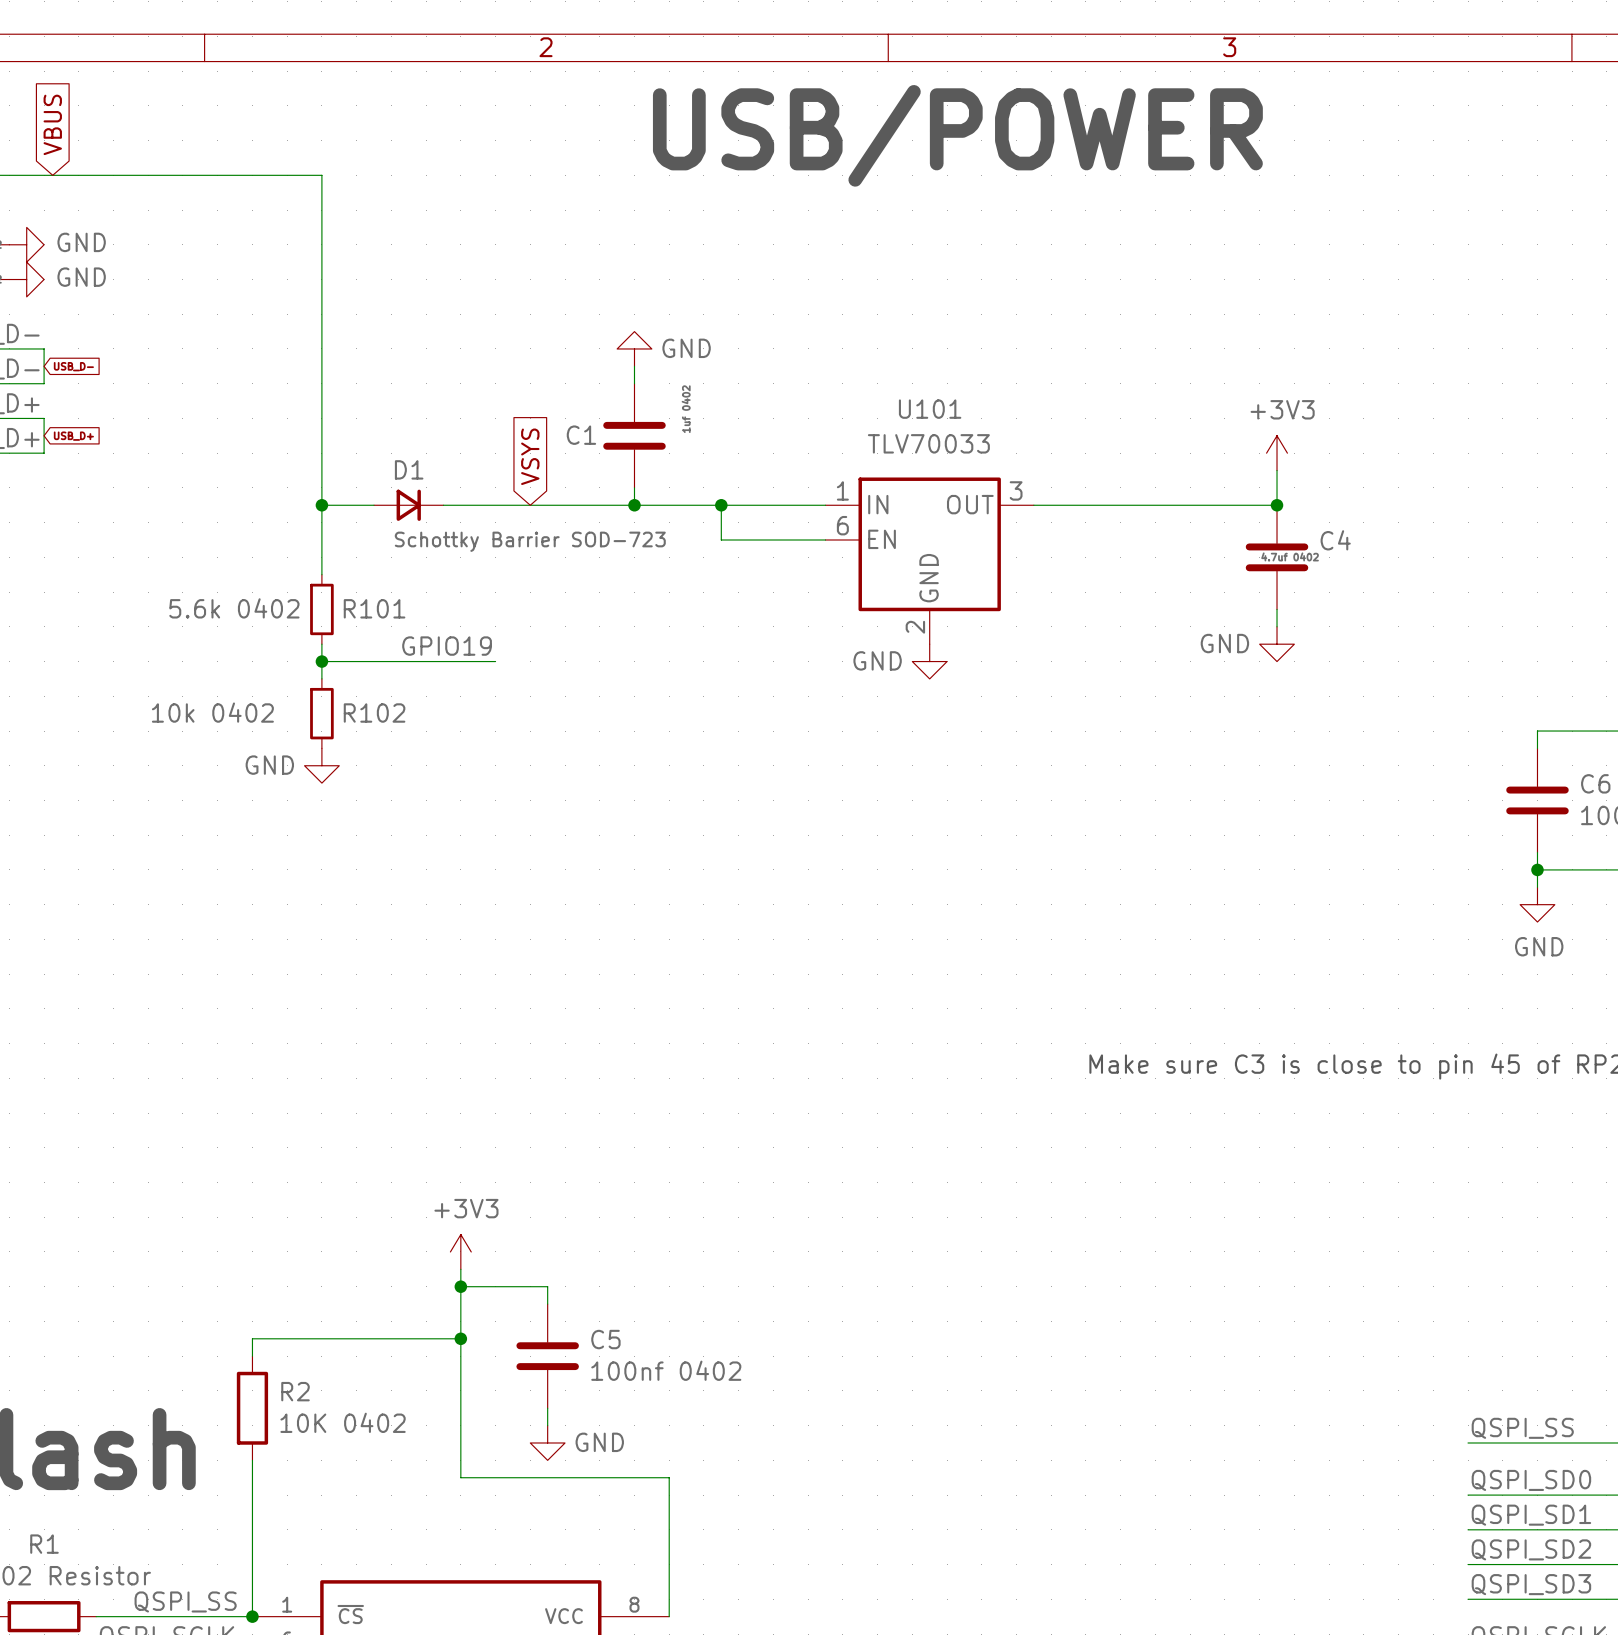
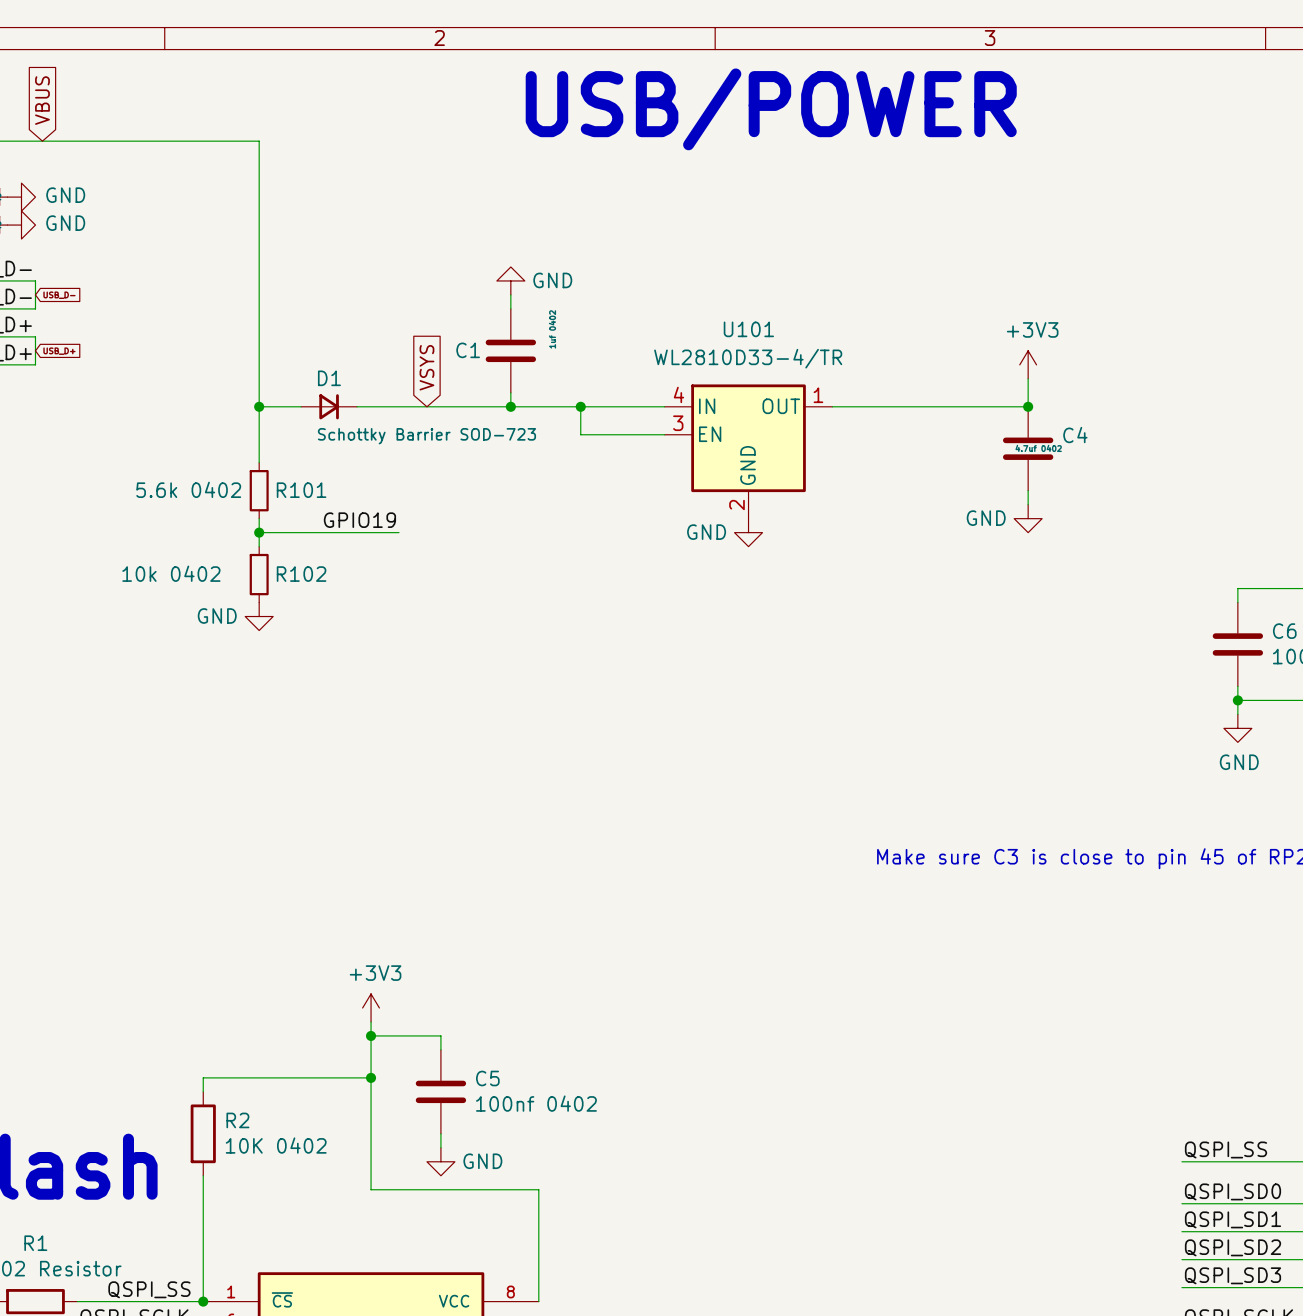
U101 value: TLV70033 (928, 443) -> WL2810D33-4/TR (748, 358)
U101 pin number: 1 (842, 490) -> 4 (678, 394)
U101 pin number: 3 (1016, 490) -> 1 (818, 395)
U101 pin number: 6 (842, 525) -> 3 (678, 423)

